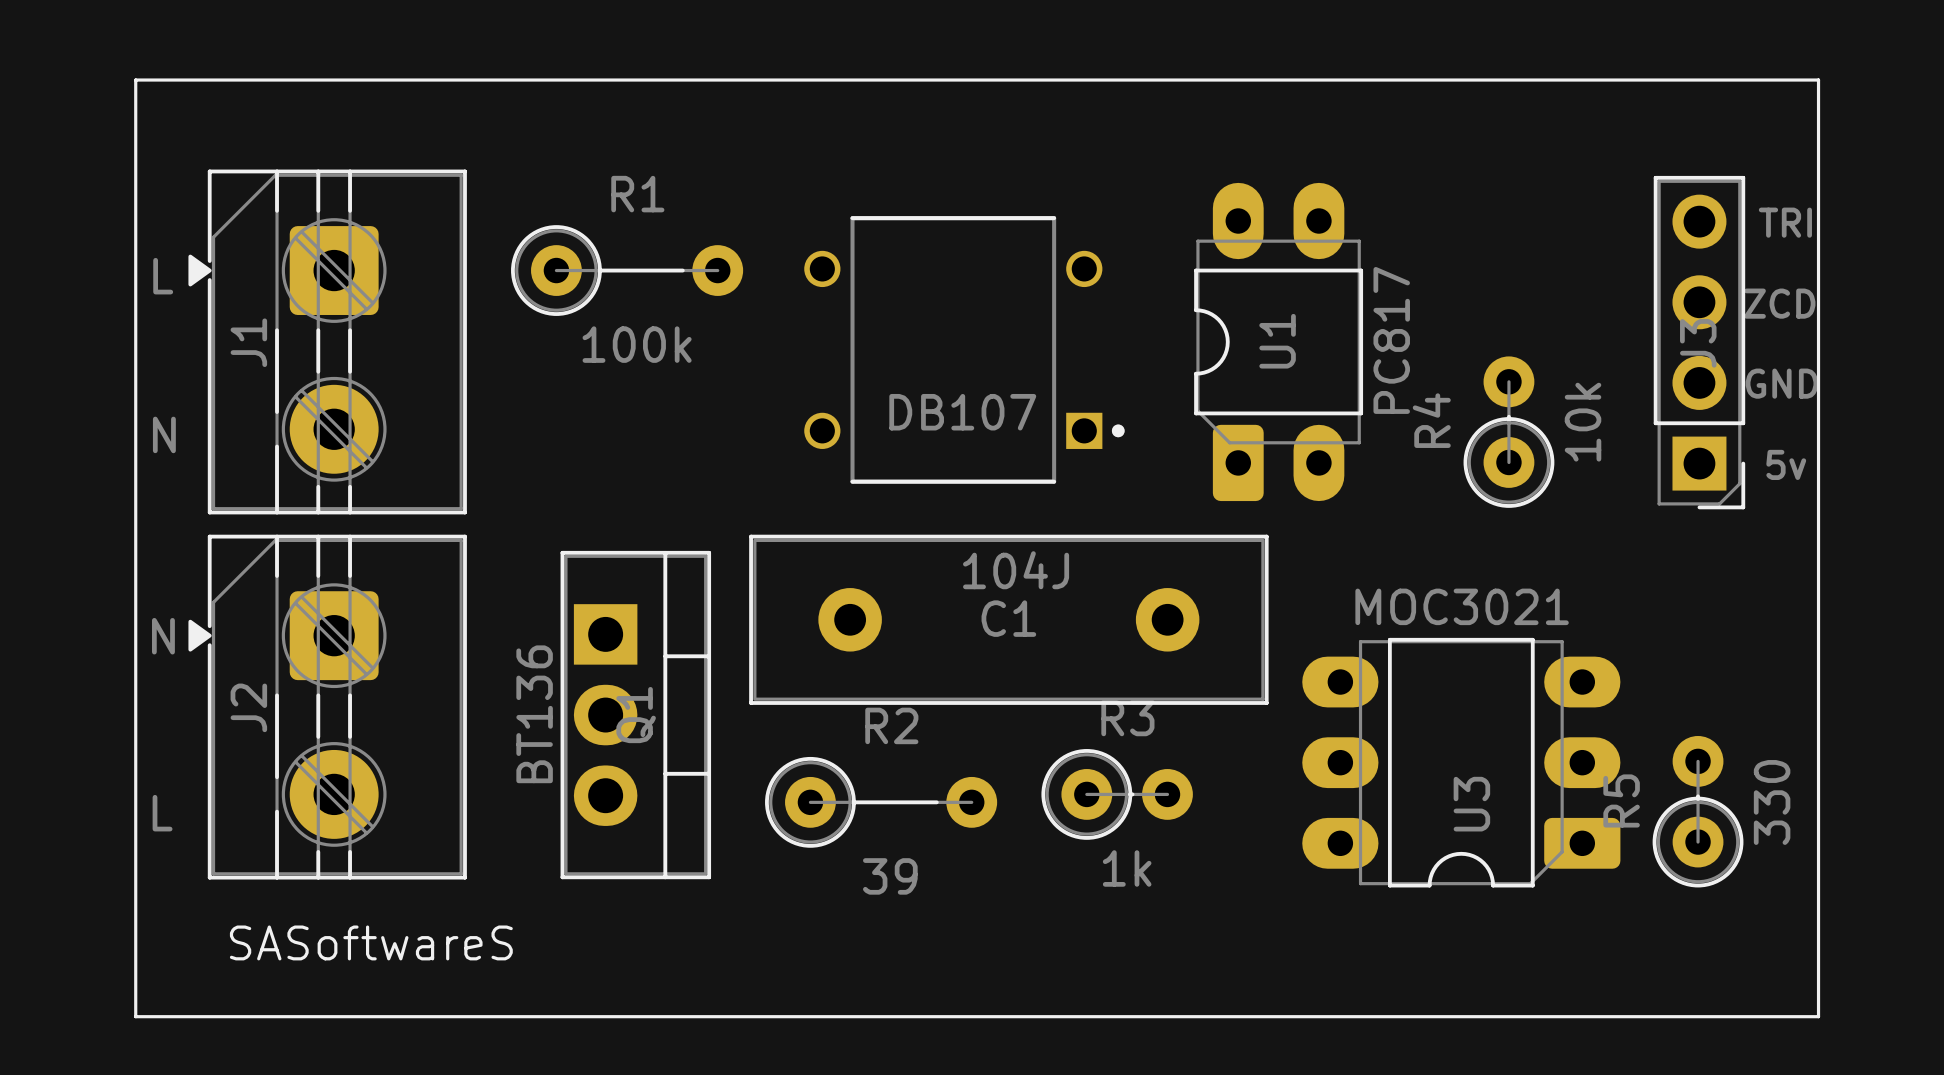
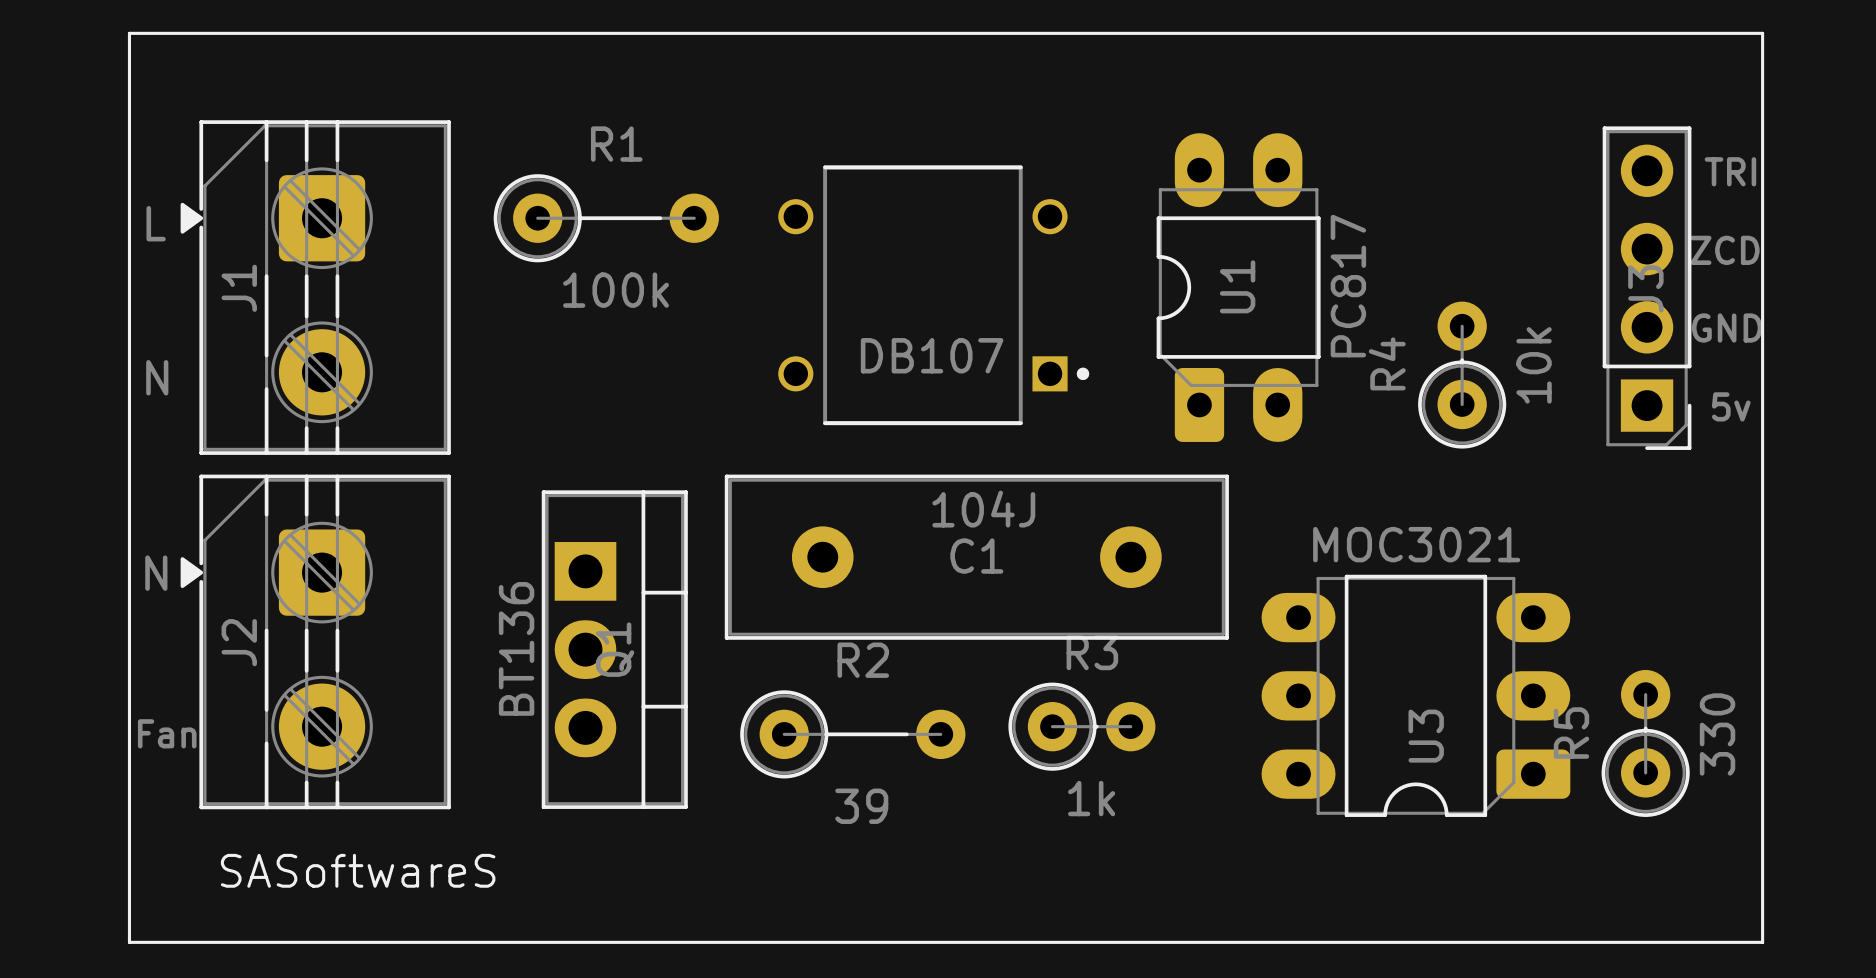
text: L (162, 813) -> Fan (167, 733)

